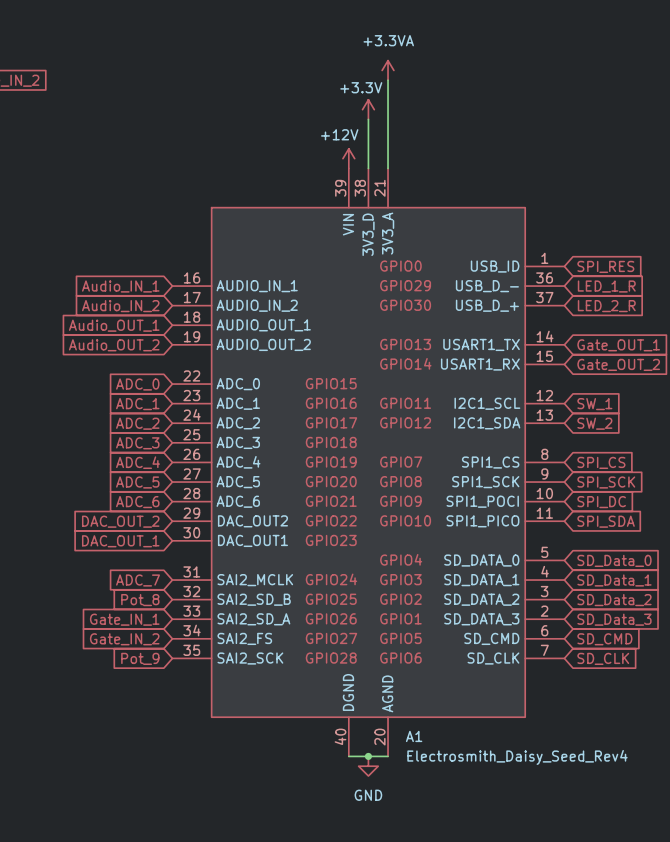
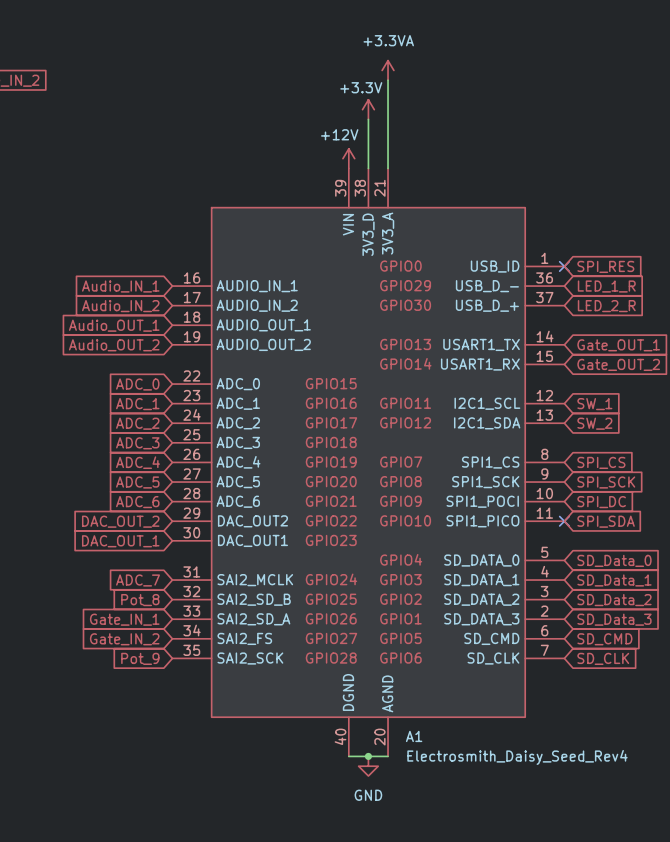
no-connect mark: none -> (564, 266)
no-connect mark: none -> (564, 521)

